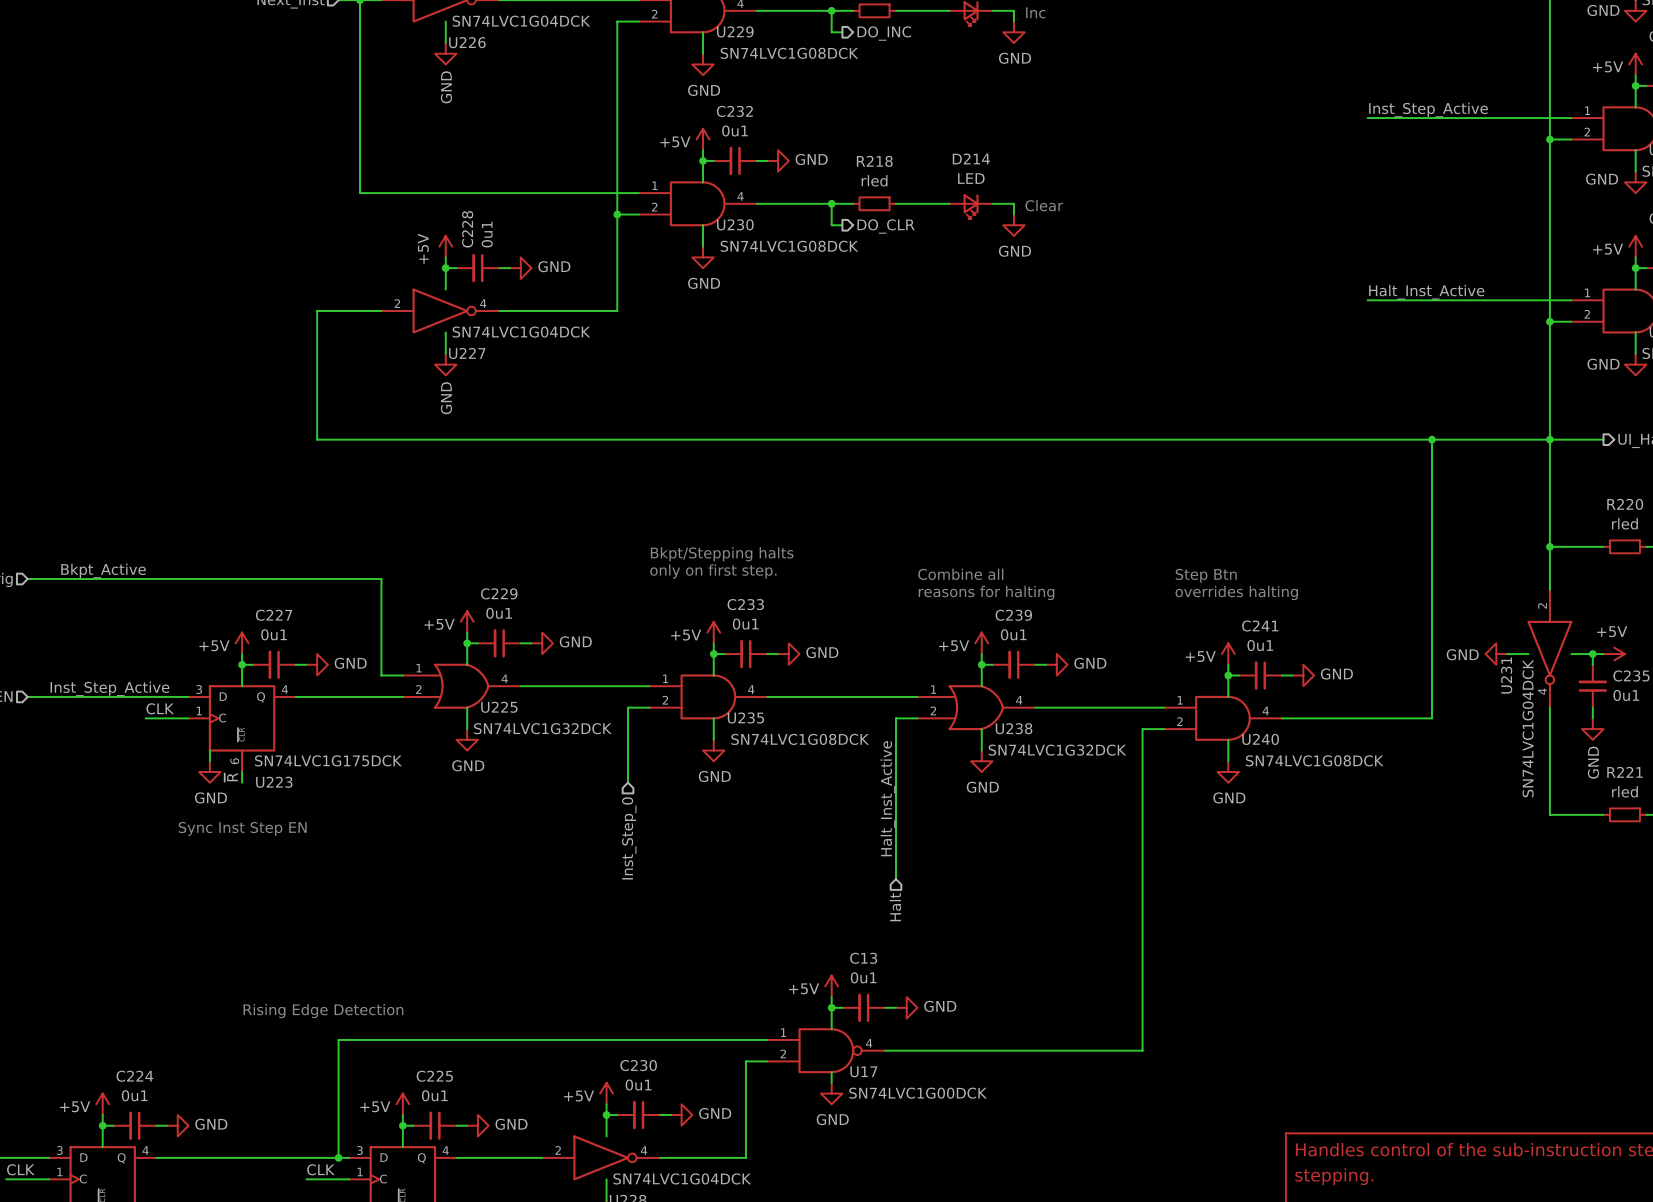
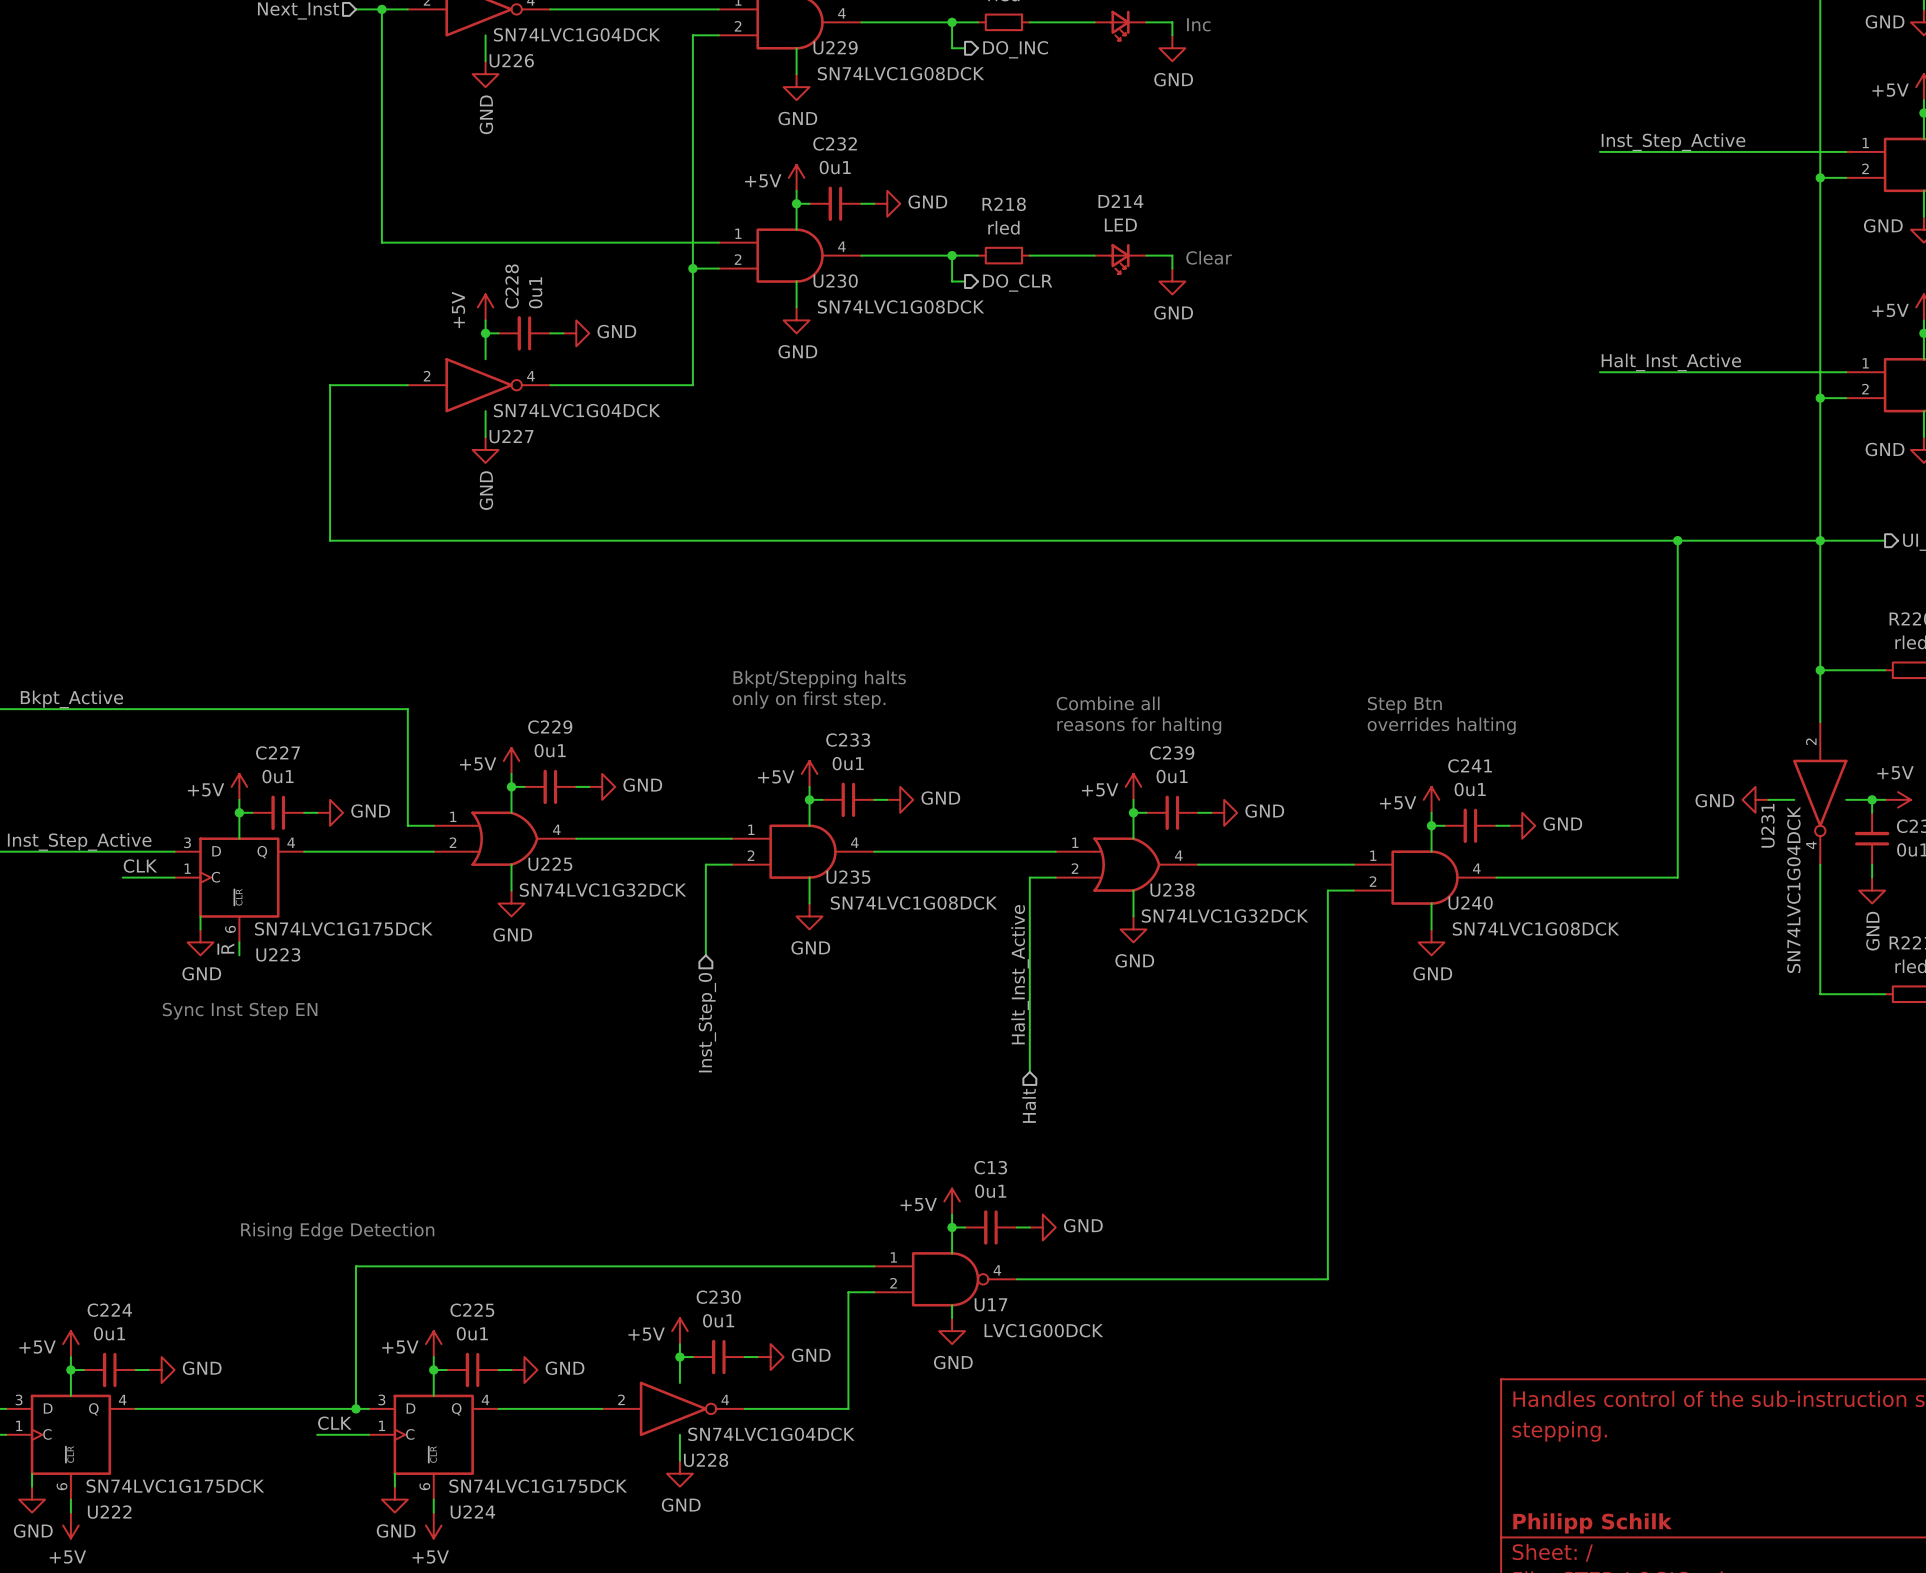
U17 value: SN74LVC1G00DCK (918, 1093) -> LVC1G00DCK (1043, 1330)

